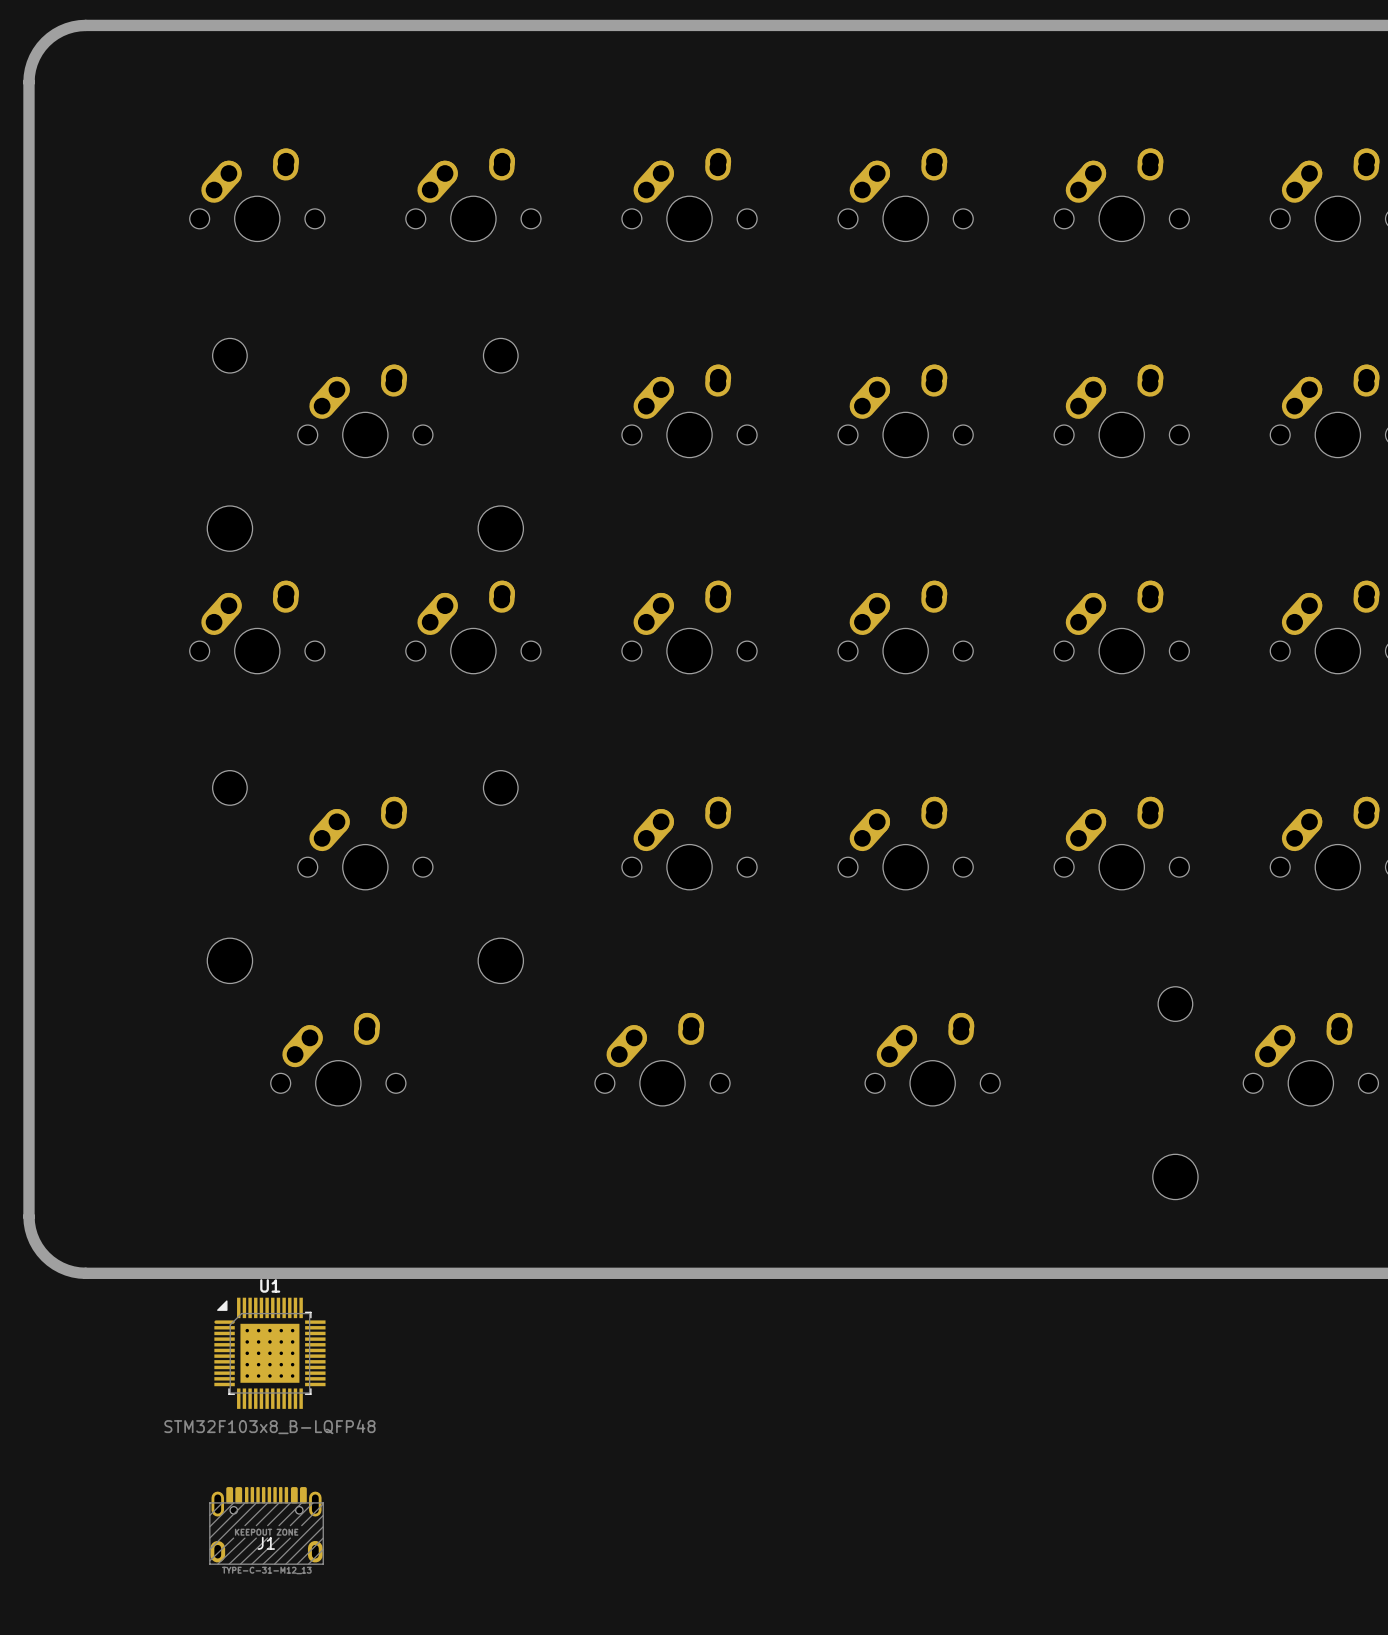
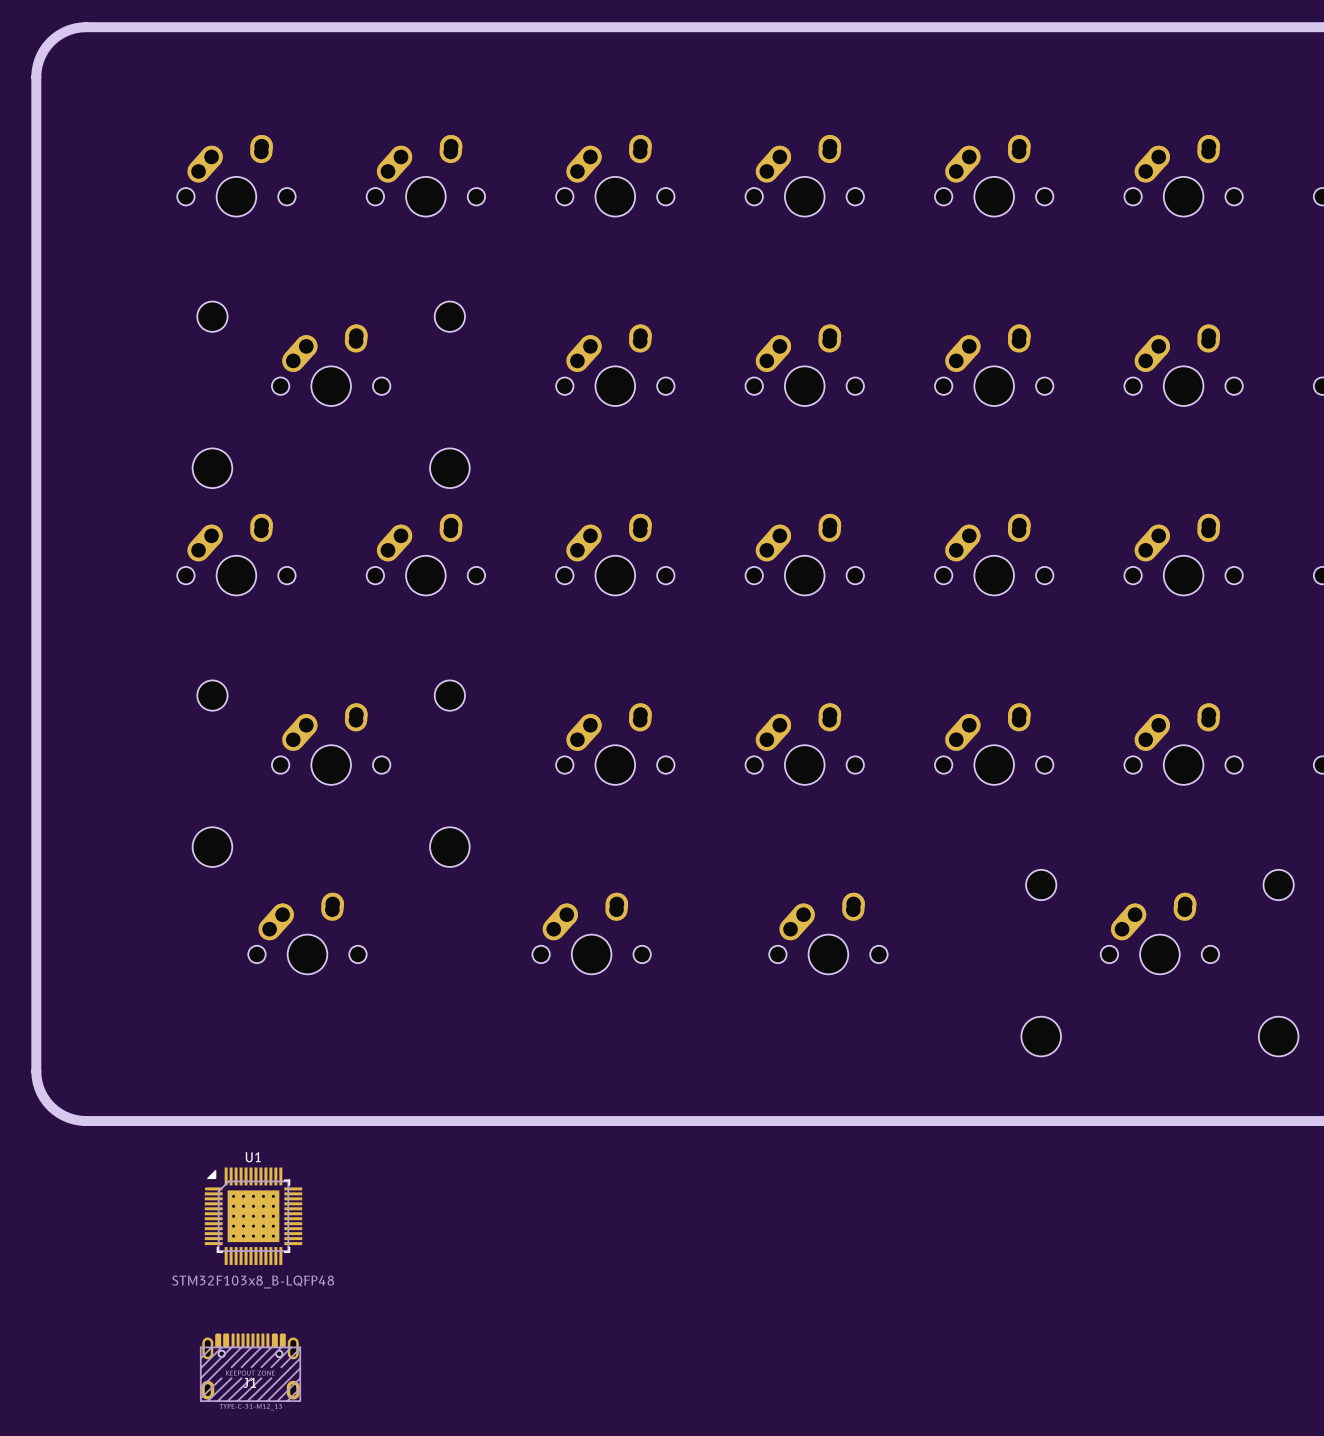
U1 position: (269, 1353) -> (253, 1216)
J1 position: (266, 1525) -> (250, 1367)

